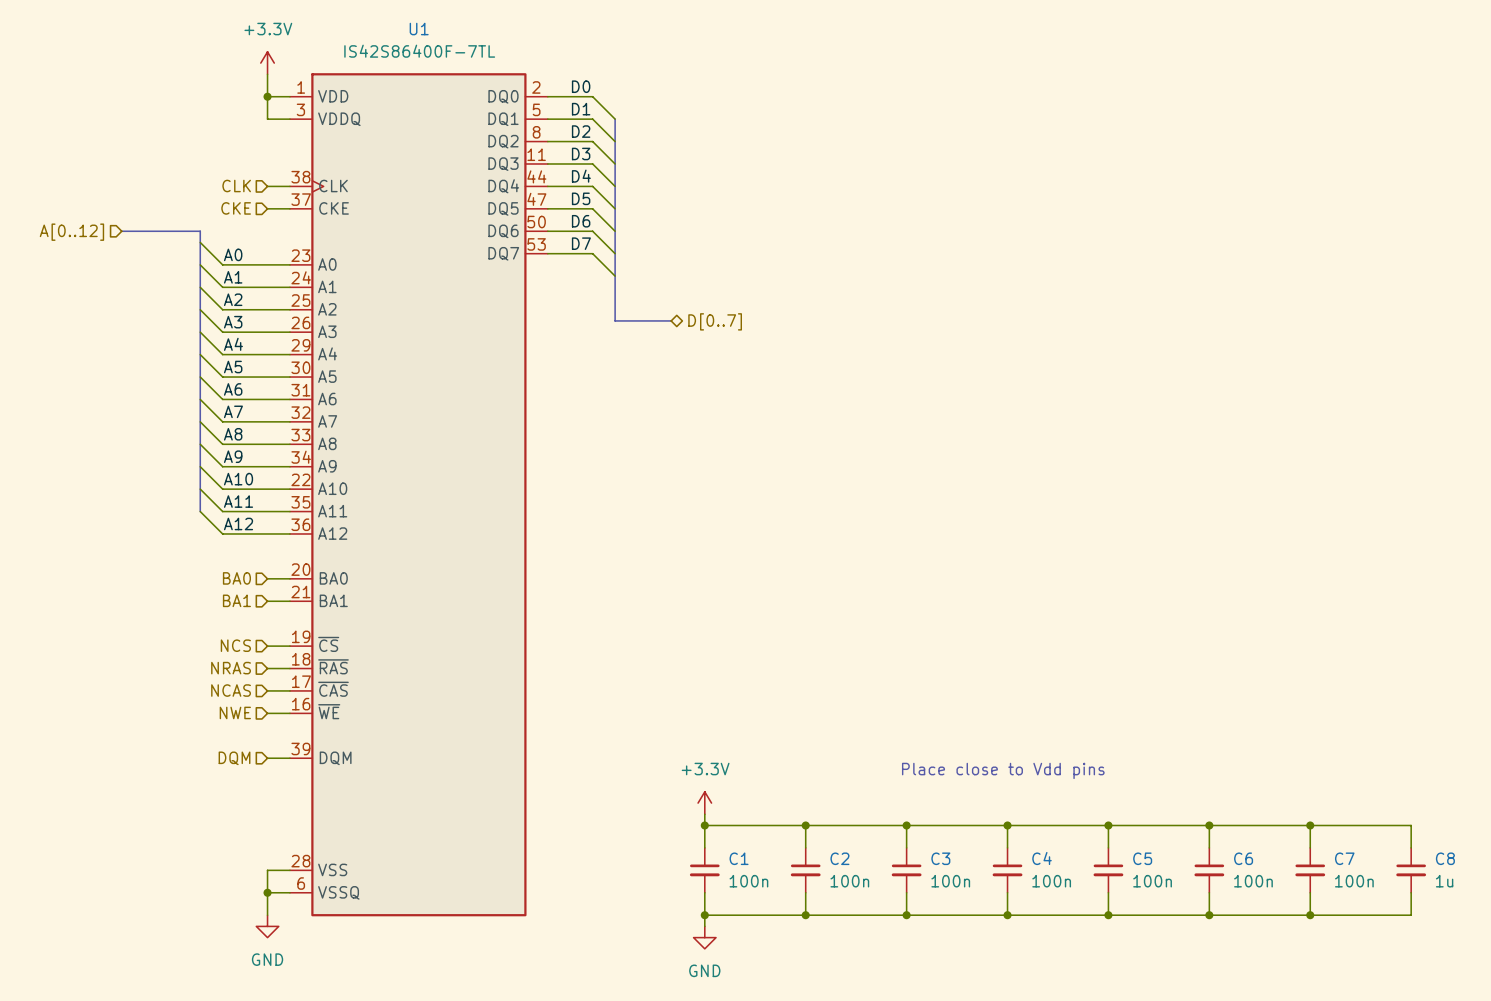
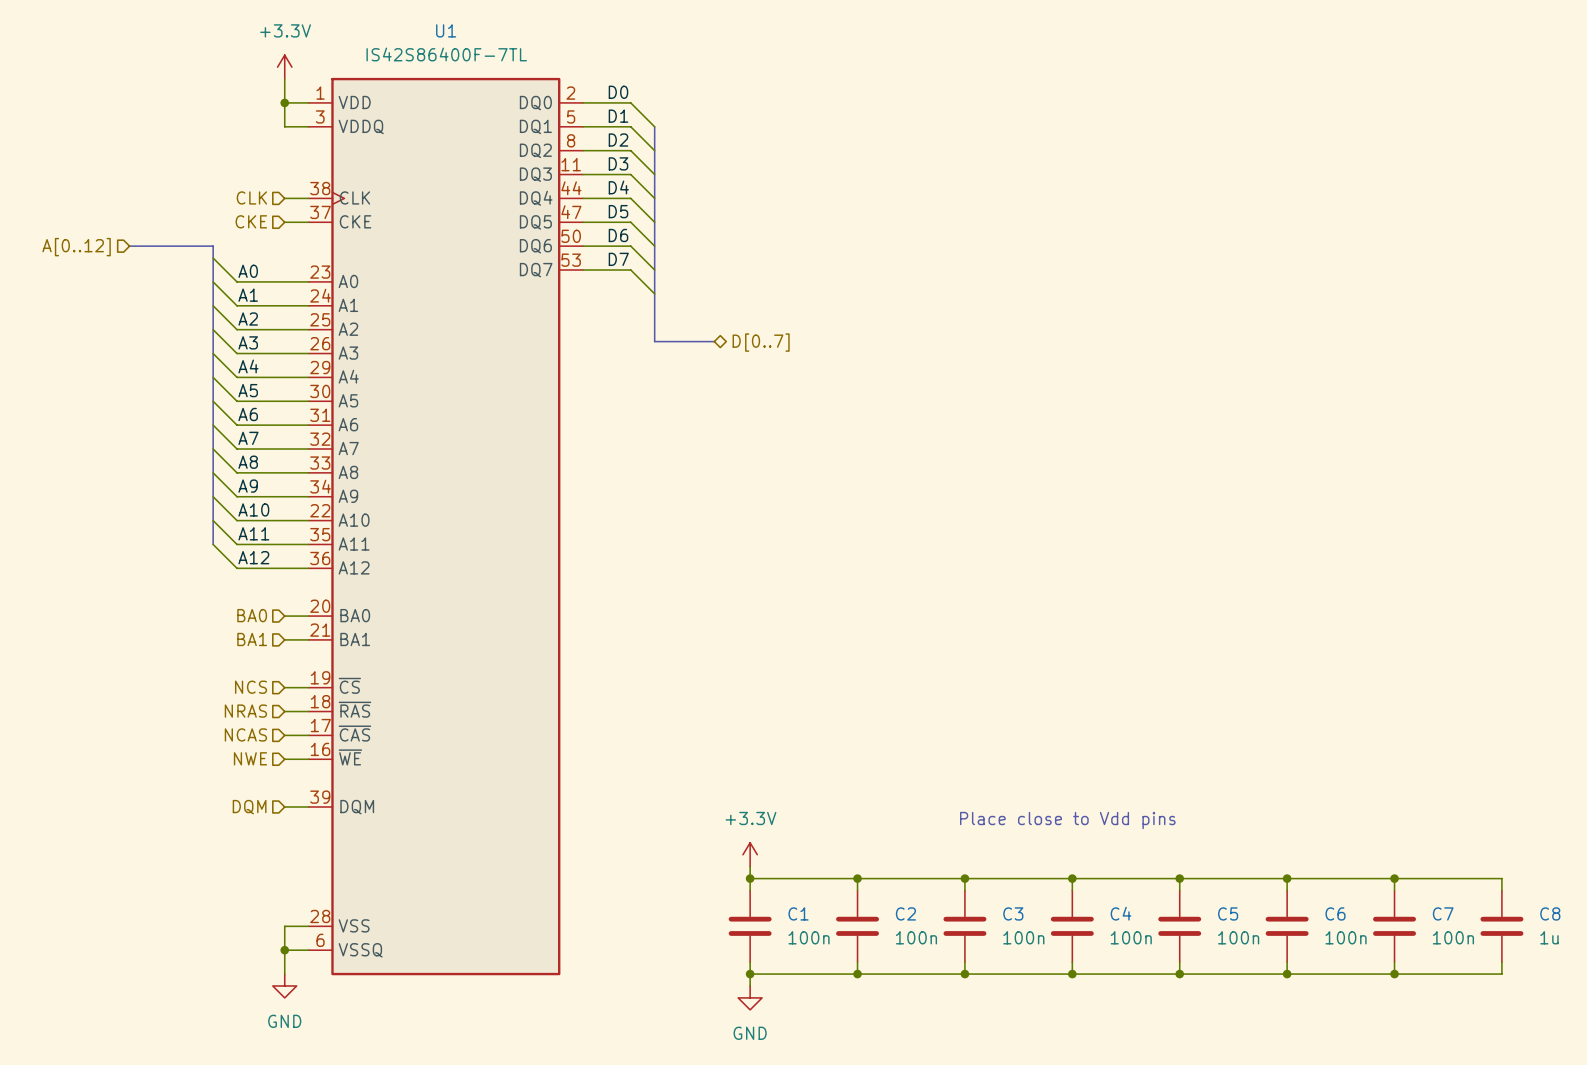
C1 symbol: [689, 847, 720, 893] -> [728, 890, 772, 963]
C2 symbol: [790, 847, 821, 893] -> [836, 890, 880, 963]
C3 symbol: [891, 847, 922, 893] -> [943, 890, 987, 963]
C4 symbol: [992, 847, 1023, 893] -> [1050, 890, 1094, 963]
C5 symbol: [1093, 847, 1124, 893] -> [1158, 890, 1202, 963]
C6 symbol: [1194, 847, 1225, 893] -> [1265, 890, 1309, 963]
C7 symbol: [1295, 847, 1326, 893] -> [1373, 890, 1417, 963]
C8 symbol: [1396, 847, 1427, 893] -> [1480, 890, 1524, 963]
C1 text: 100n (748, 881) -> none
C1 value: none -> 100n (809, 937)
C2 text: 100n (849, 881) -> none
C2 value: none -> 100n (916, 937)
C3 text: 100n (950, 881) -> none
C3 value: none -> 100n (1023, 937)
C4 text: 100n (1051, 881) -> none
C4 value: none -> 100n (1131, 937)
C5 text: 100n (1152, 881) -> none
C5 value: none -> 100n (1238, 937)
C6 text: 100n (1253, 881) -> none
C6 value: none -> 100n (1346, 937)
C7 text: 100n (1354, 881) -> none
C7 value: none -> 100n (1453, 937)
C8 text: 1u (1444, 881) -> none
C8 value: none -> 1u (1549, 937)

